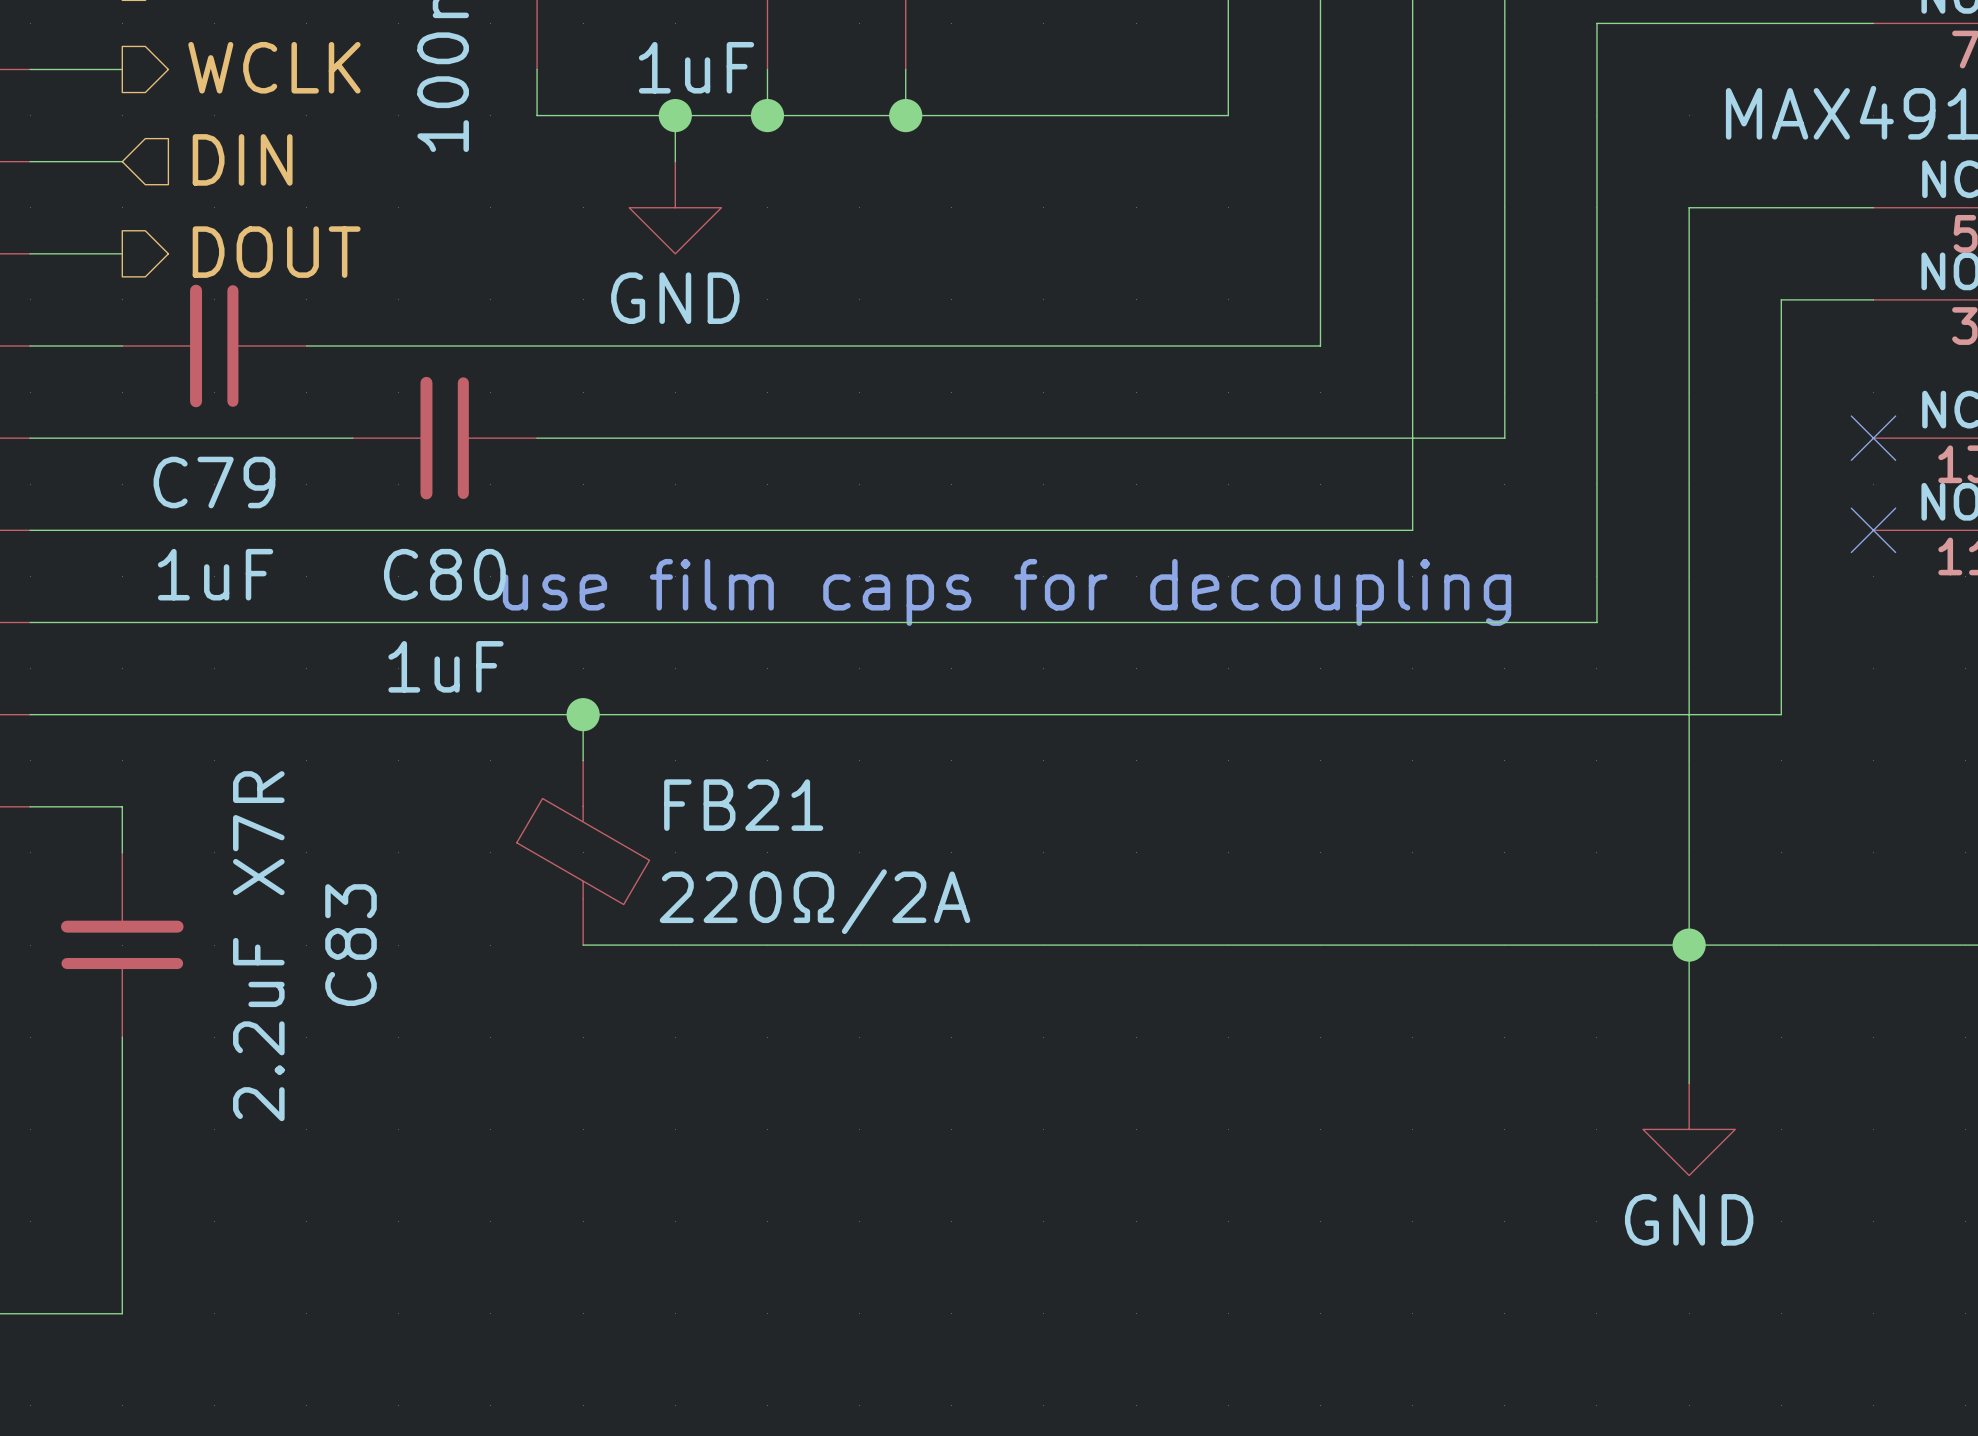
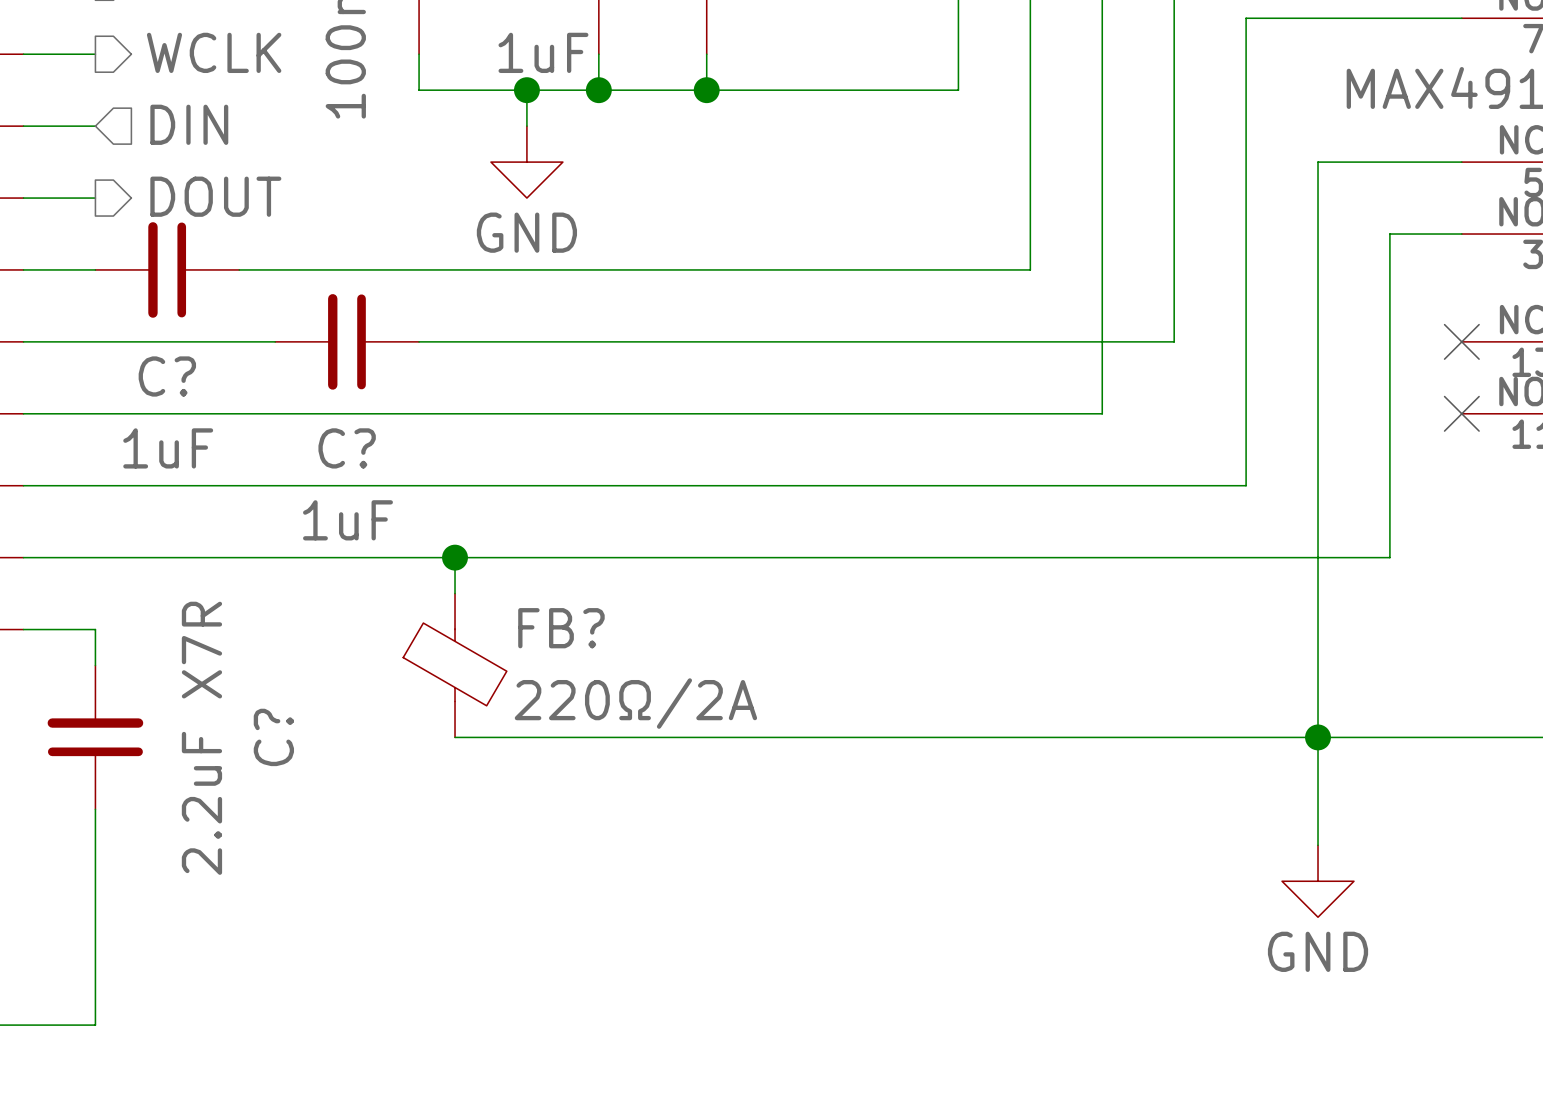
C79 name: C79 (214, 482) -> C? (167, 376)
C80 name: C80 (444, 574) -> C? (347, 448)
text: use film caps for decoupling (1007, 592) -> none
FB21 name: FB21 (743, 805) -> FB? (561, 628)
C83 name: C83 (351, 945) -> C? (273, 737)

